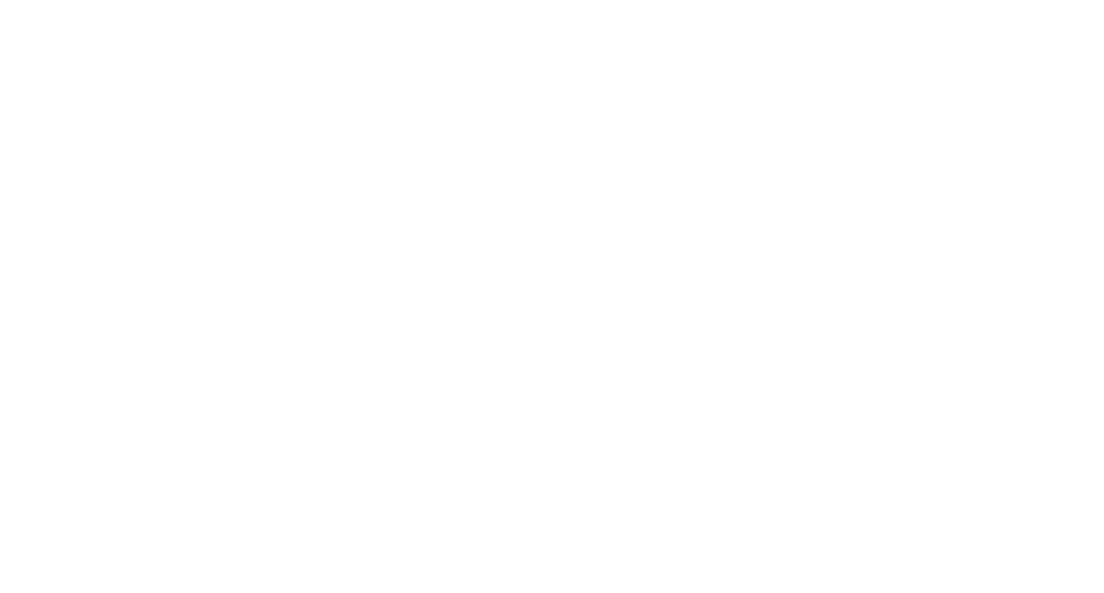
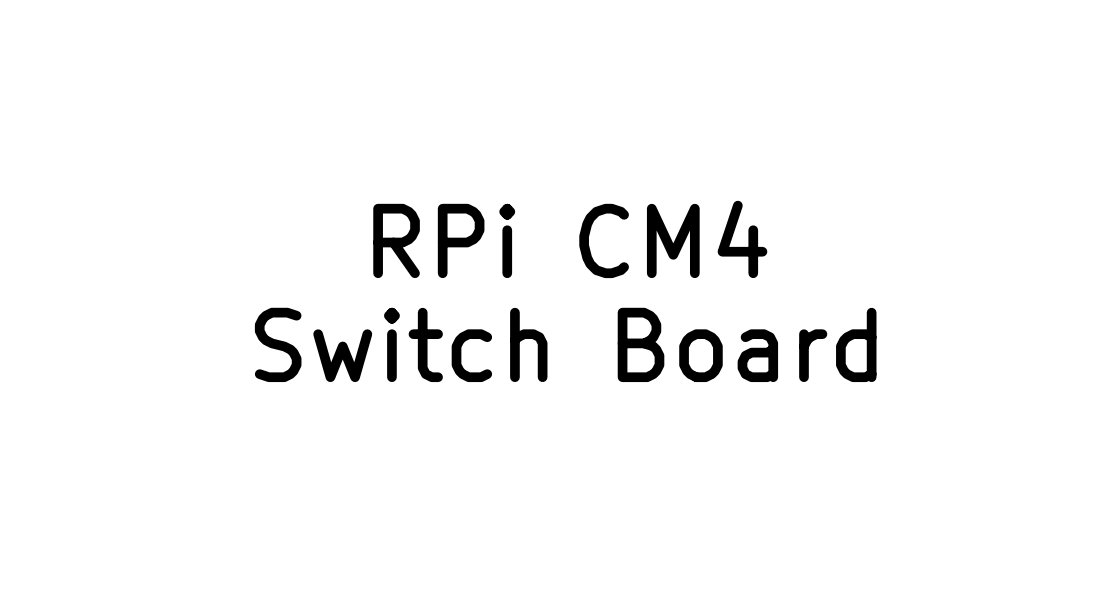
text: none -> RPi CM4 (570, 239)
text: none -> Switch Board (565, 344)

